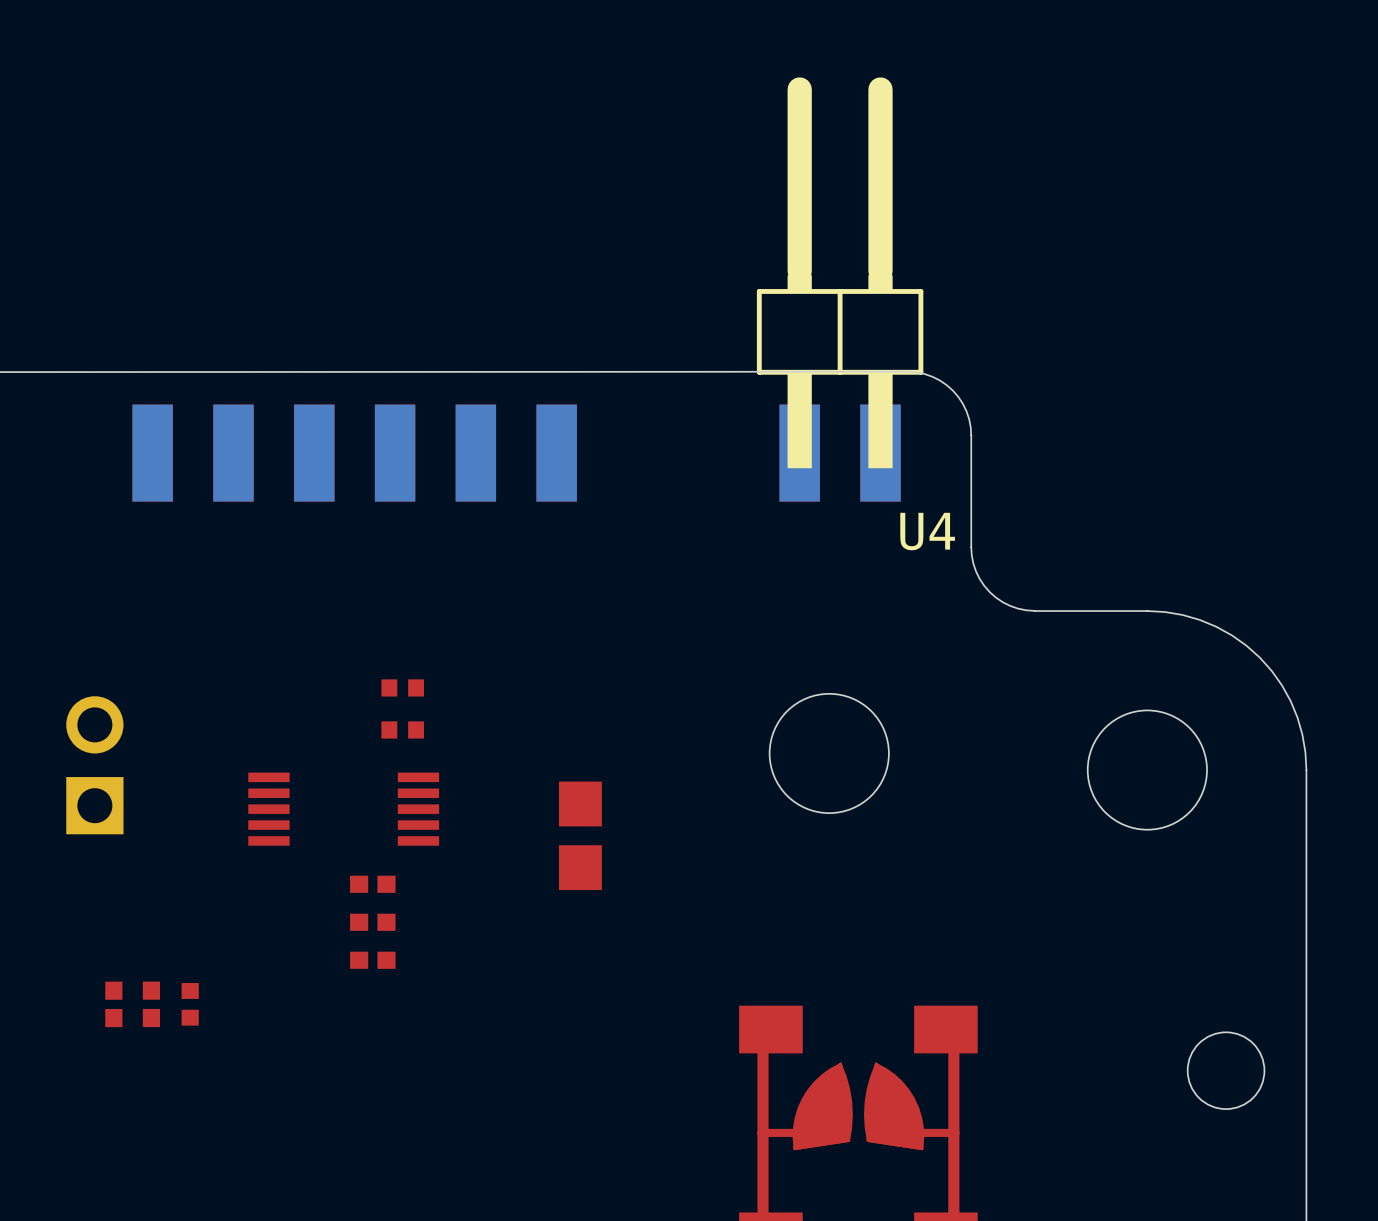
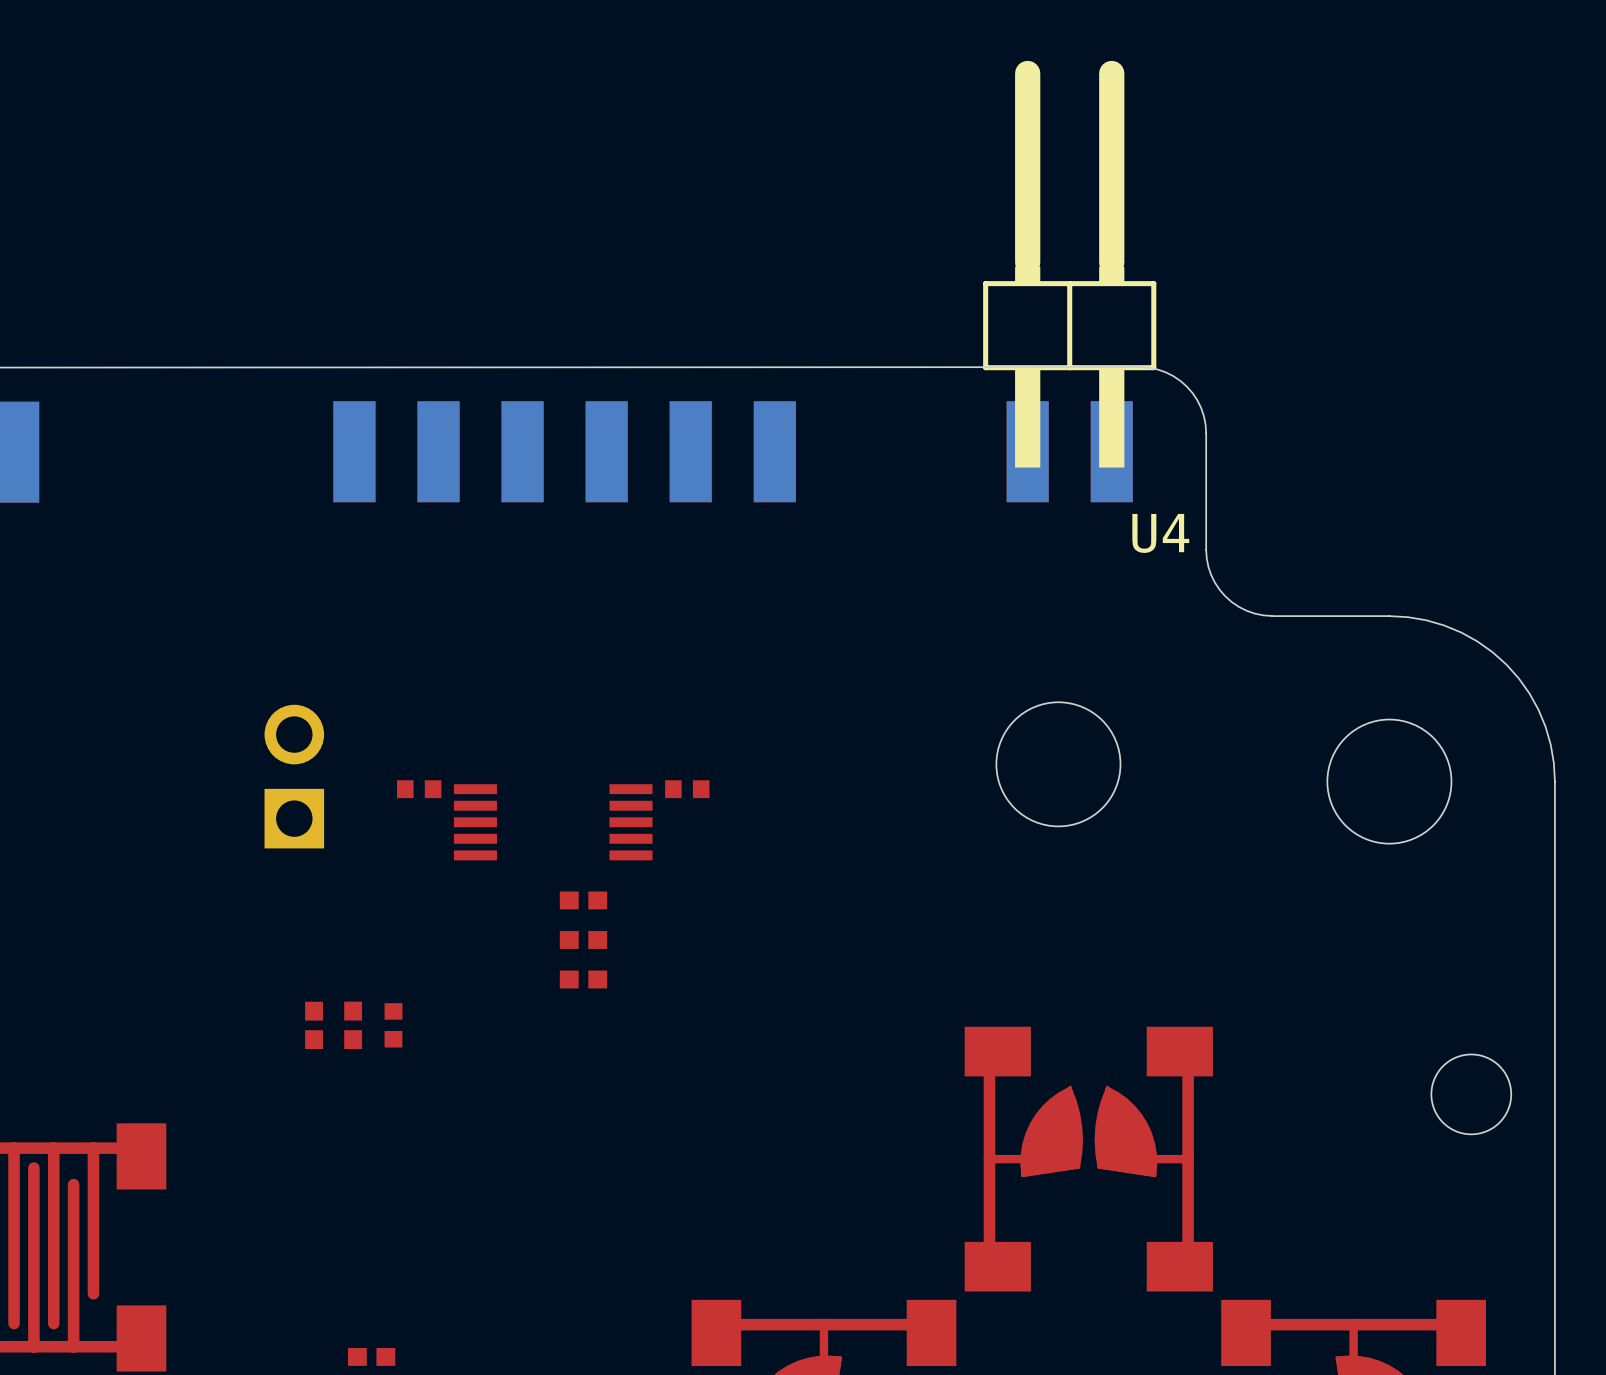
part: (402, 687) -> none
part: (402, 729) -> none
part: none -> (419, 789)
part: none -> (687, 789)
part: (580, 835) -> none

